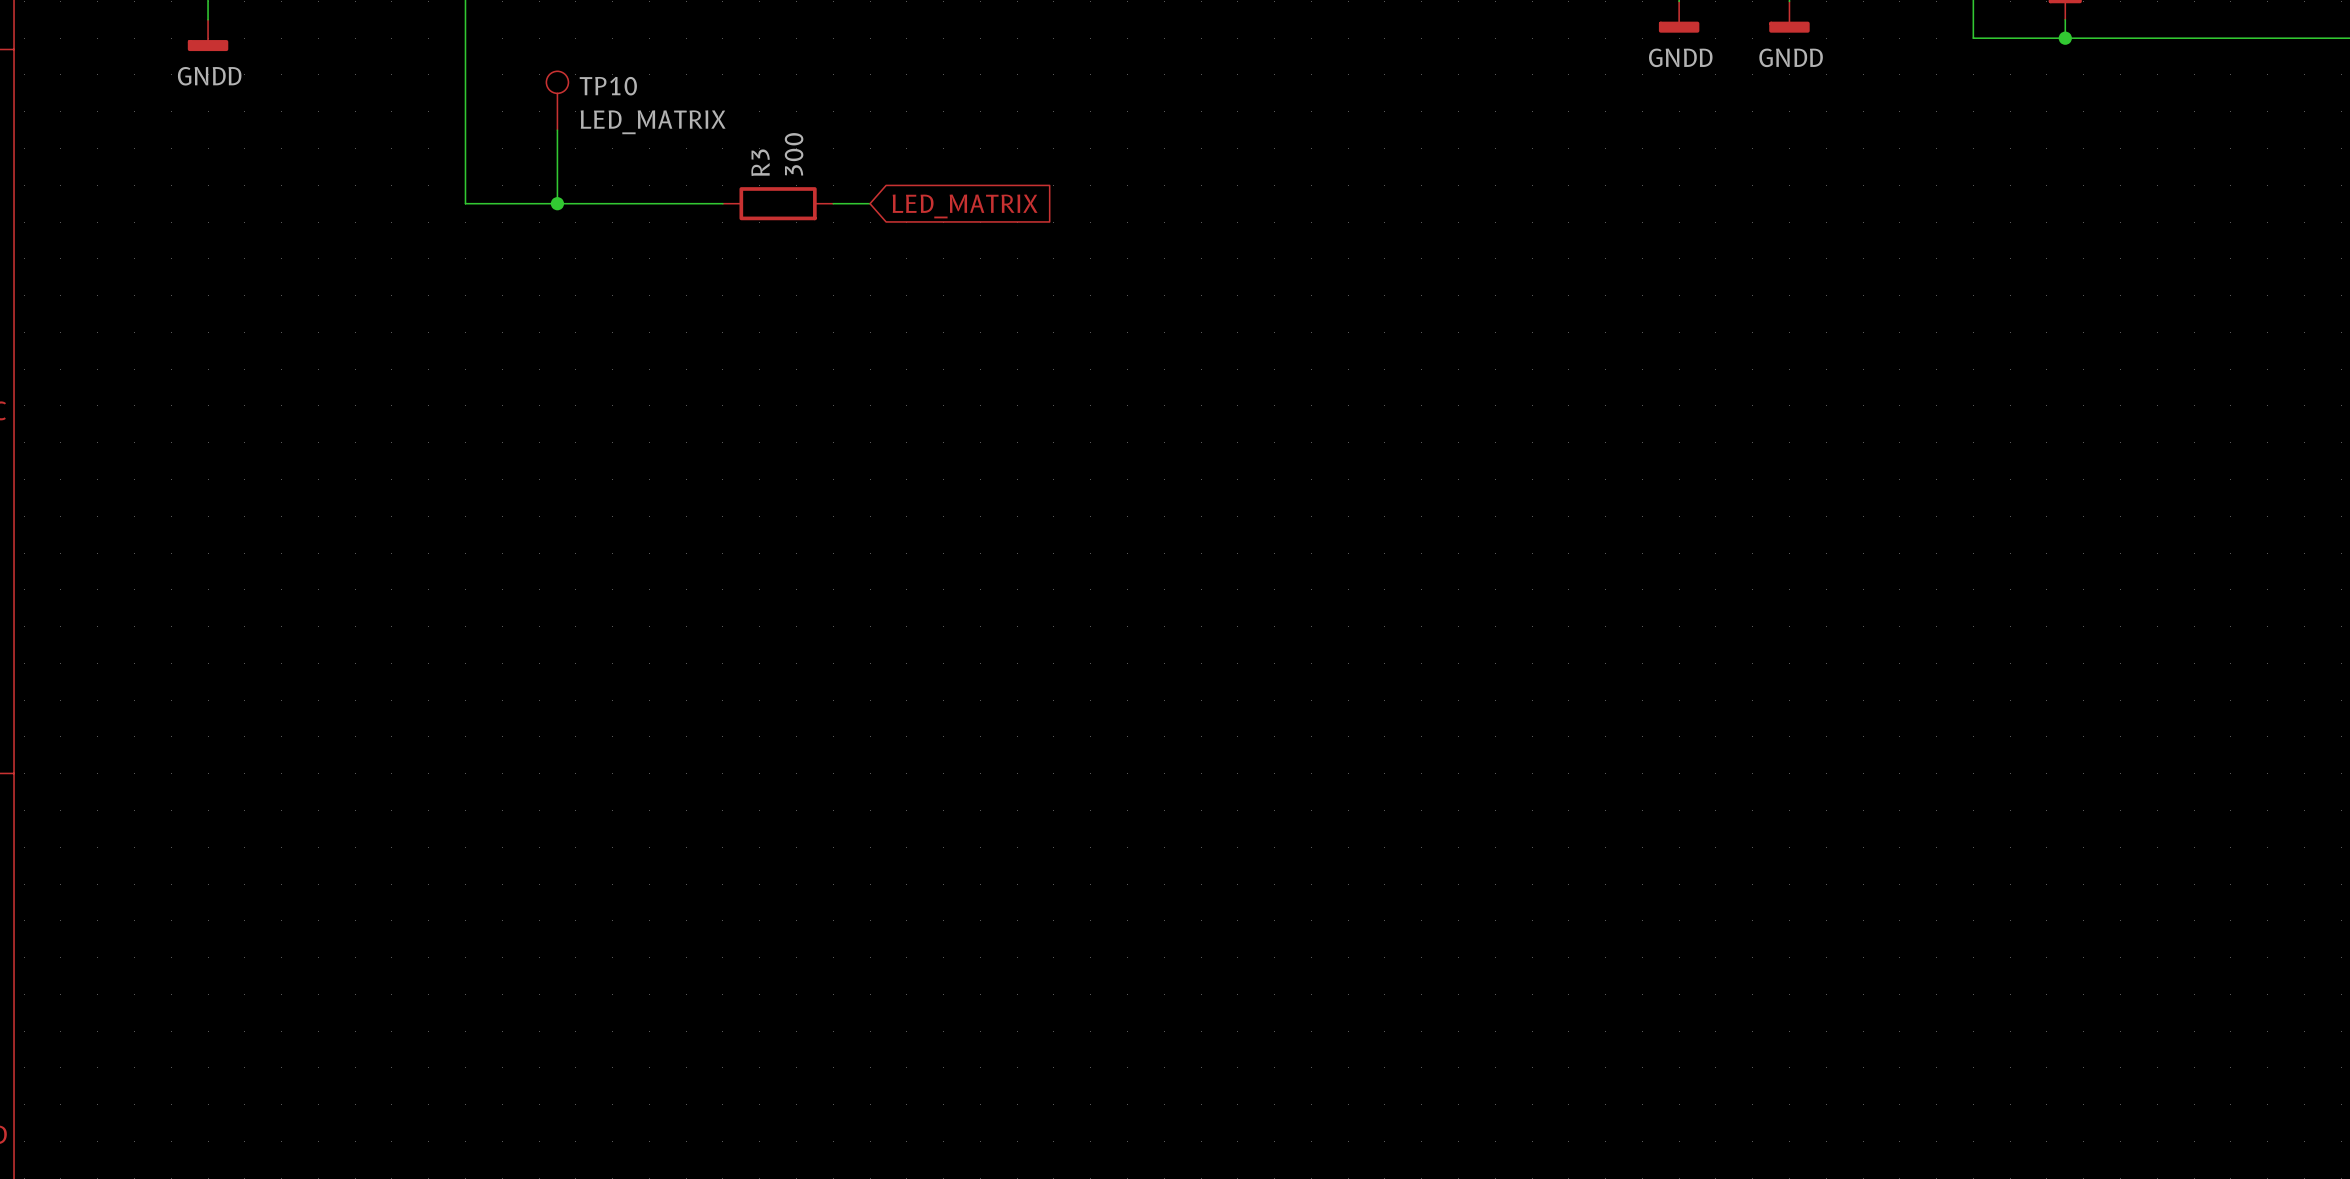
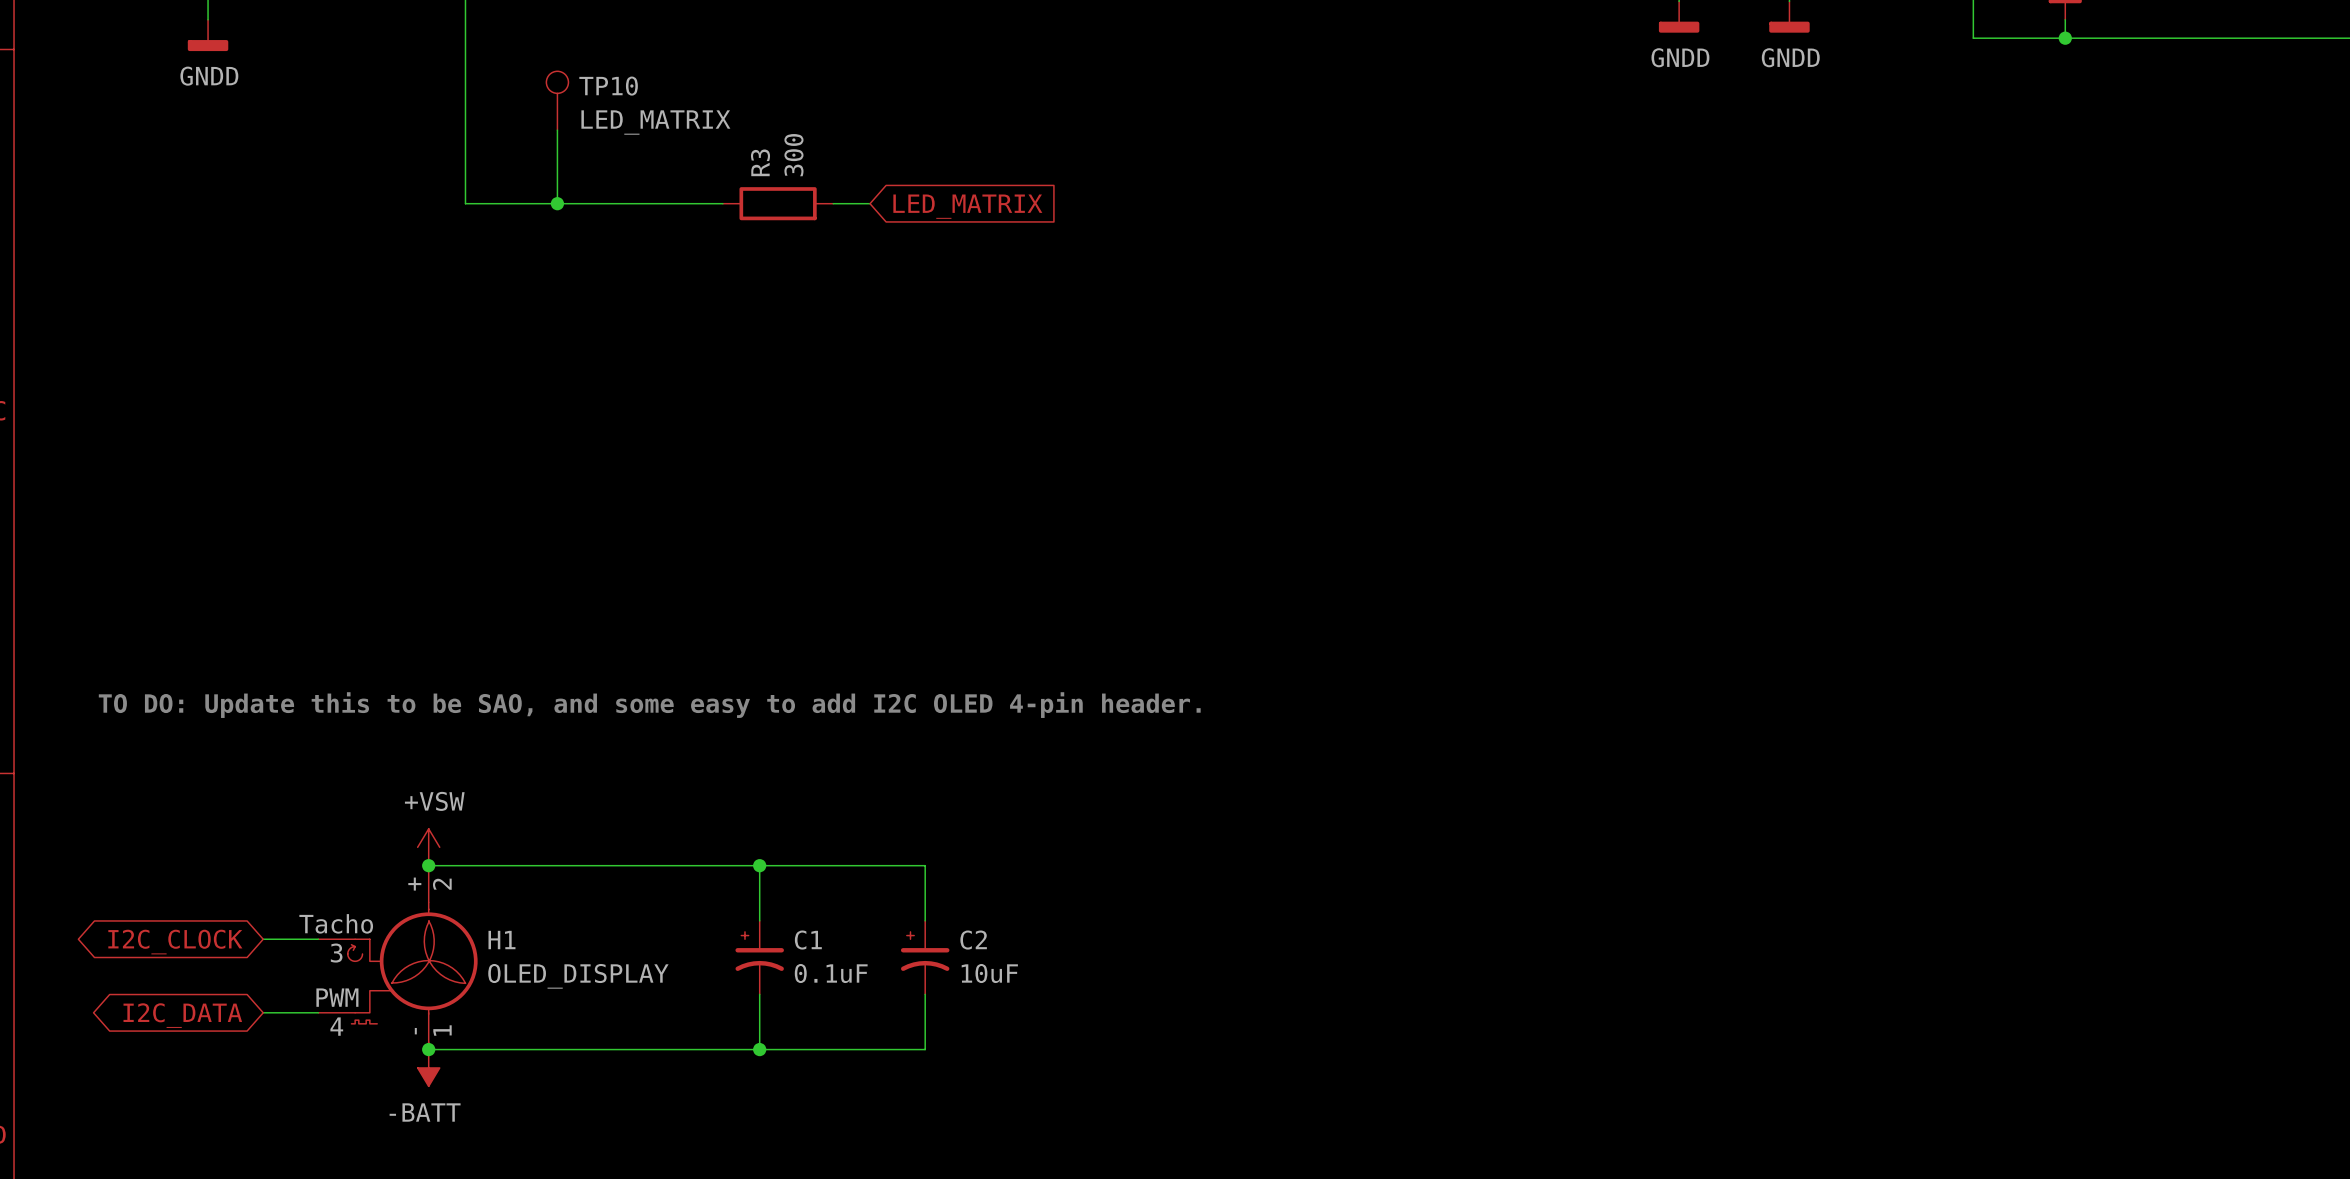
text: none -> TO DO: Update this to be SAO, and some easy to add I2C OLED 4-pin header. (649, 705)
power symbol: none -> +VSW (428, 847)
wire: none -> (428, 865) (925, 865) (925, 920)
junction: none -> (428, 865)
wire: none -> (759, 865) (759, 920)
junction: none -> (759, 865)
wire: none -> (263, 939) (318, 939)
global label: none -> I2C_CLOCK (175, 942)
H1: none -> OLED_DISPLAY (397, 957)
C1: none -> 0.1uF (759, 957)
C2: none -> 10uF (925, 957)
wire: none -> (759, 994) (759, 1049)
wire: none -> (925, 994) (925, 1049) (428, 1049)
wire: none -> (263, 1012) (318, 1012)
global label: none -> I2C_DATA (182, 1015)
junction: none -> (428, 1049)
junction: none -> (759, 1049)
power symbol: none -> -BATT (428, 1067)

